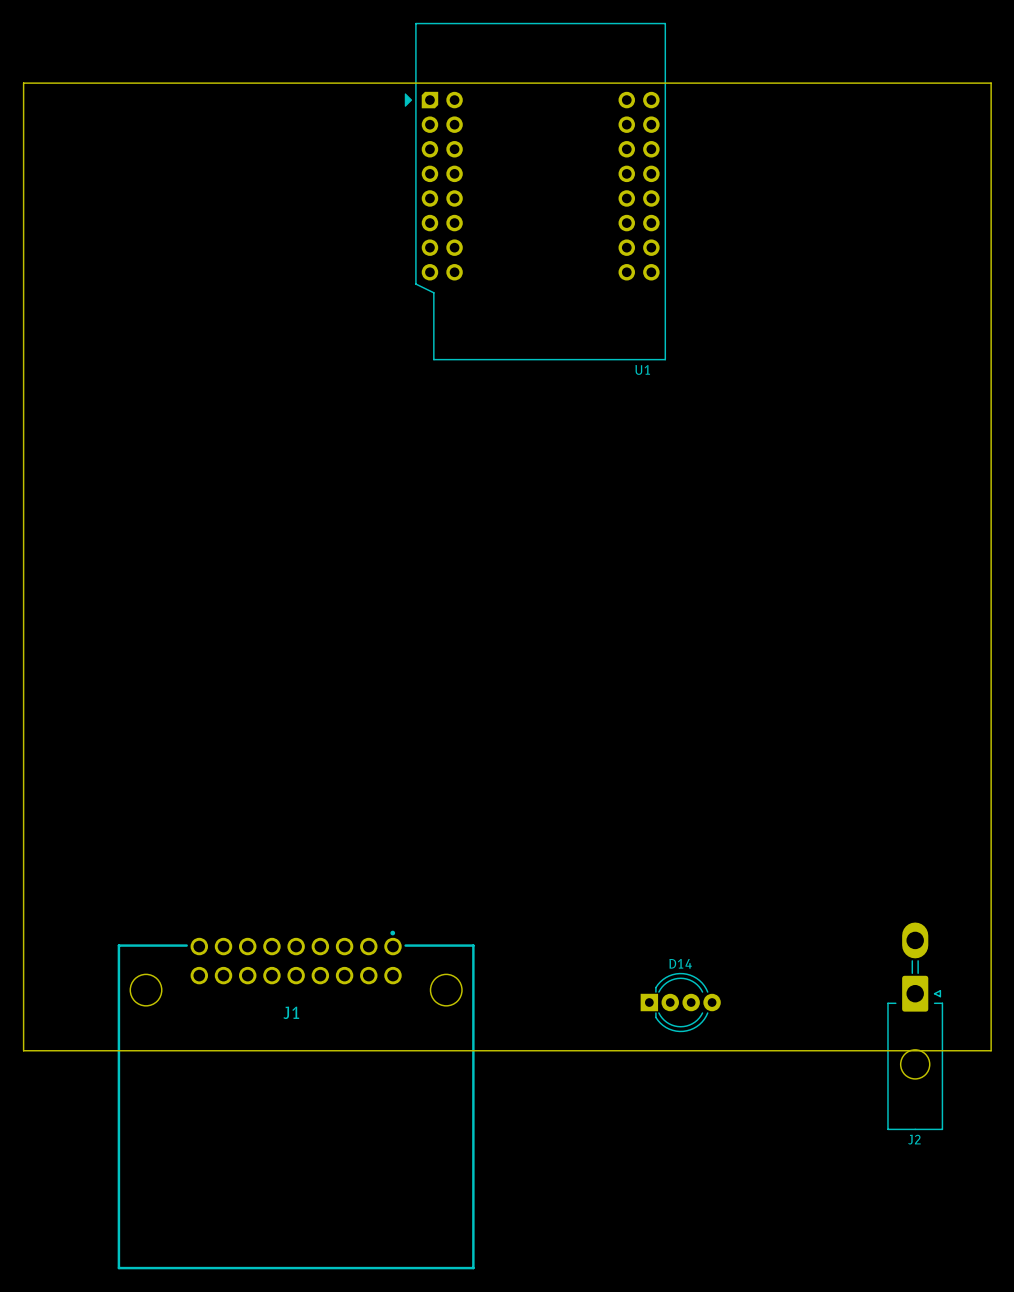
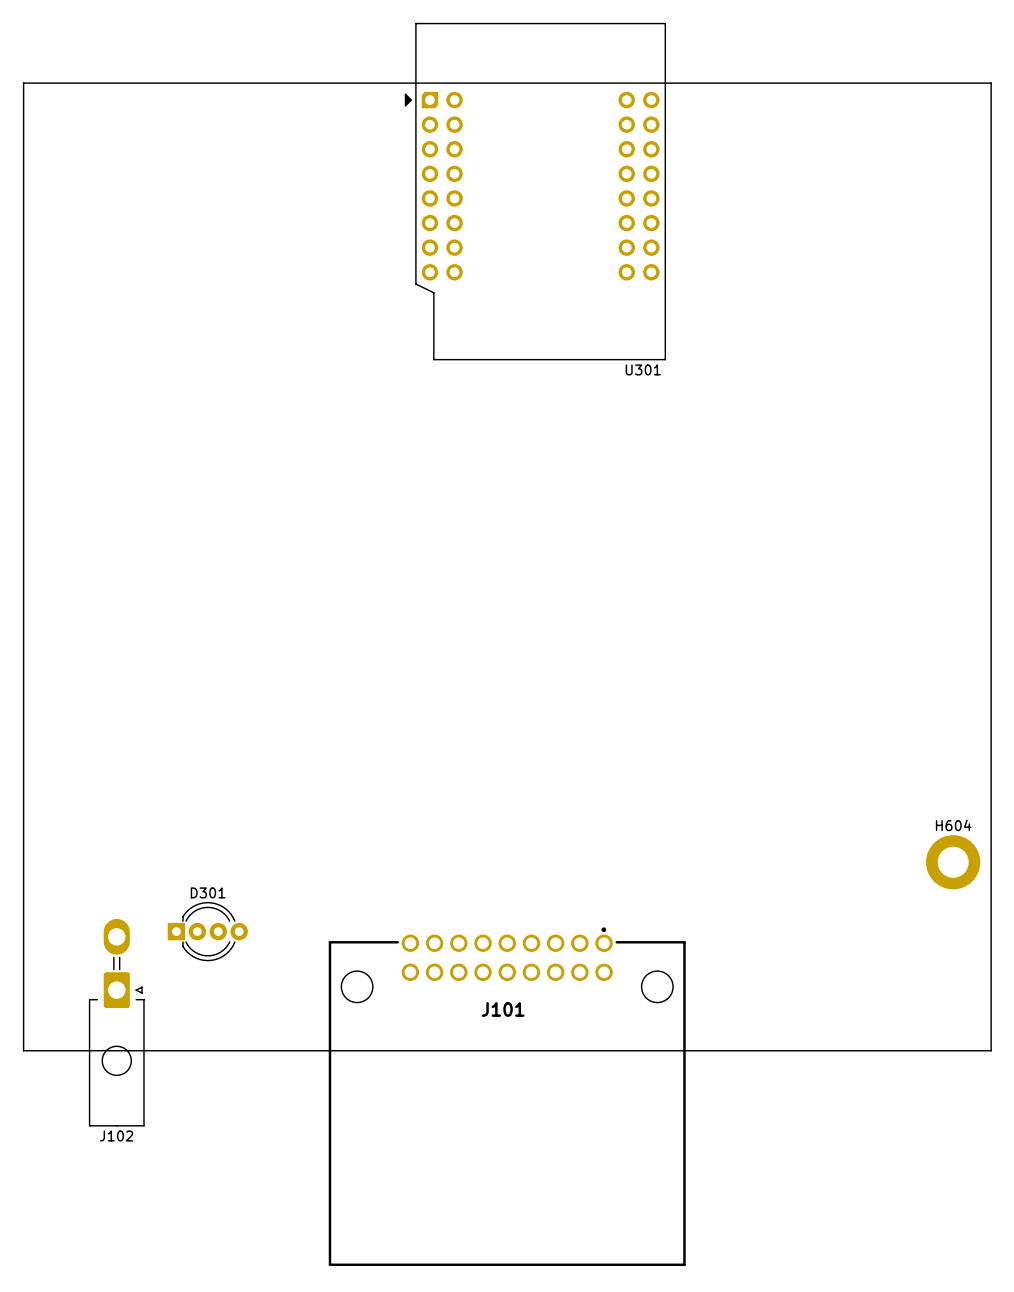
U1 name: U1 (642, 369) -> U301 (643, 369)
H604: none -> (953, 862)
D301: none -> (207, 931)
D14: (680, 1002) -> none
J102: none -> (116, 1022)
J2: (915, 1026) -> none
J101: none -> (507, 1096)
J1: (296, 1100) -> none

